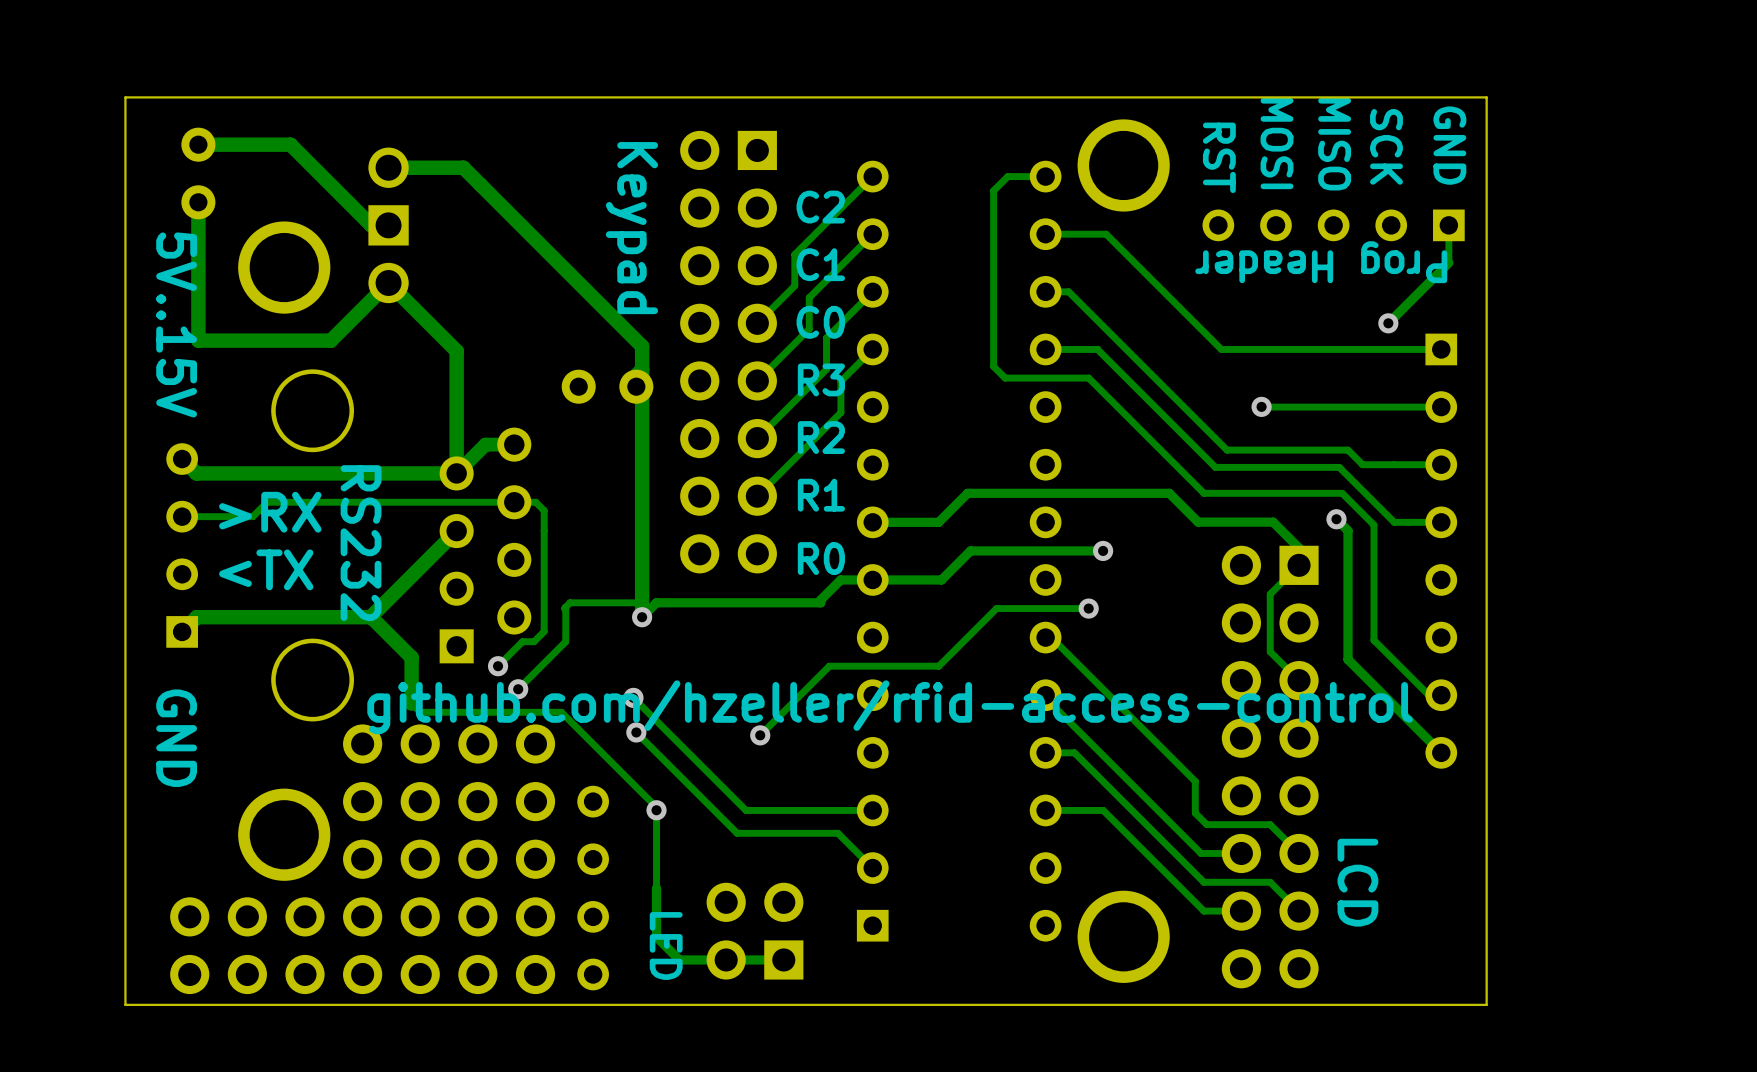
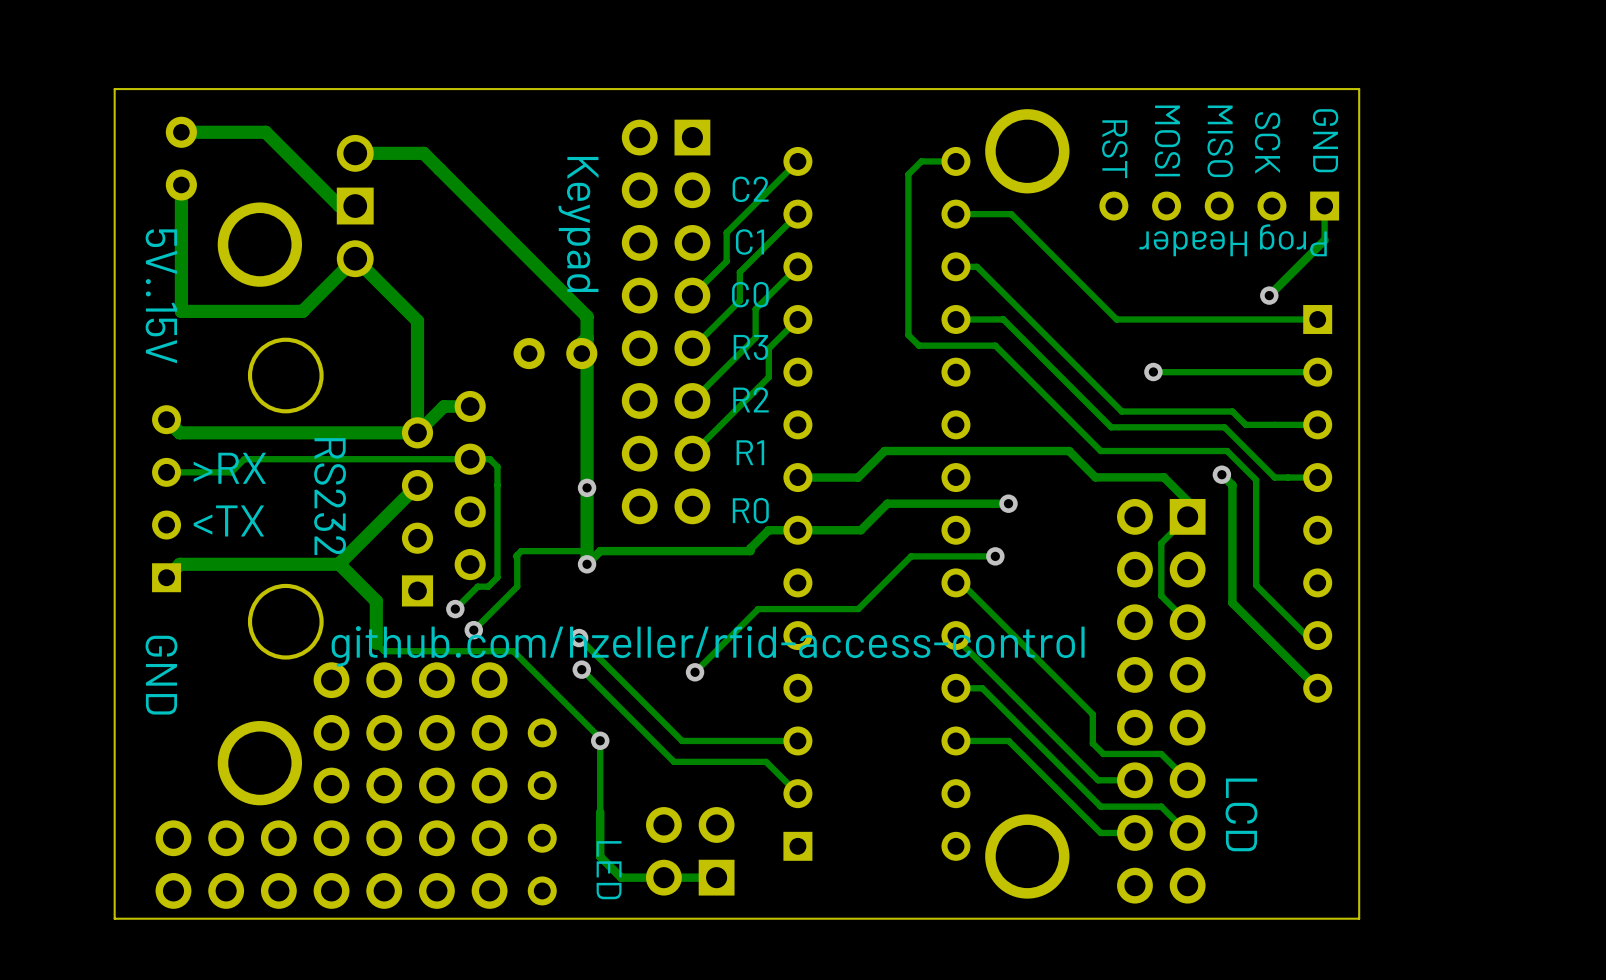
via: none -> (587, 487)

